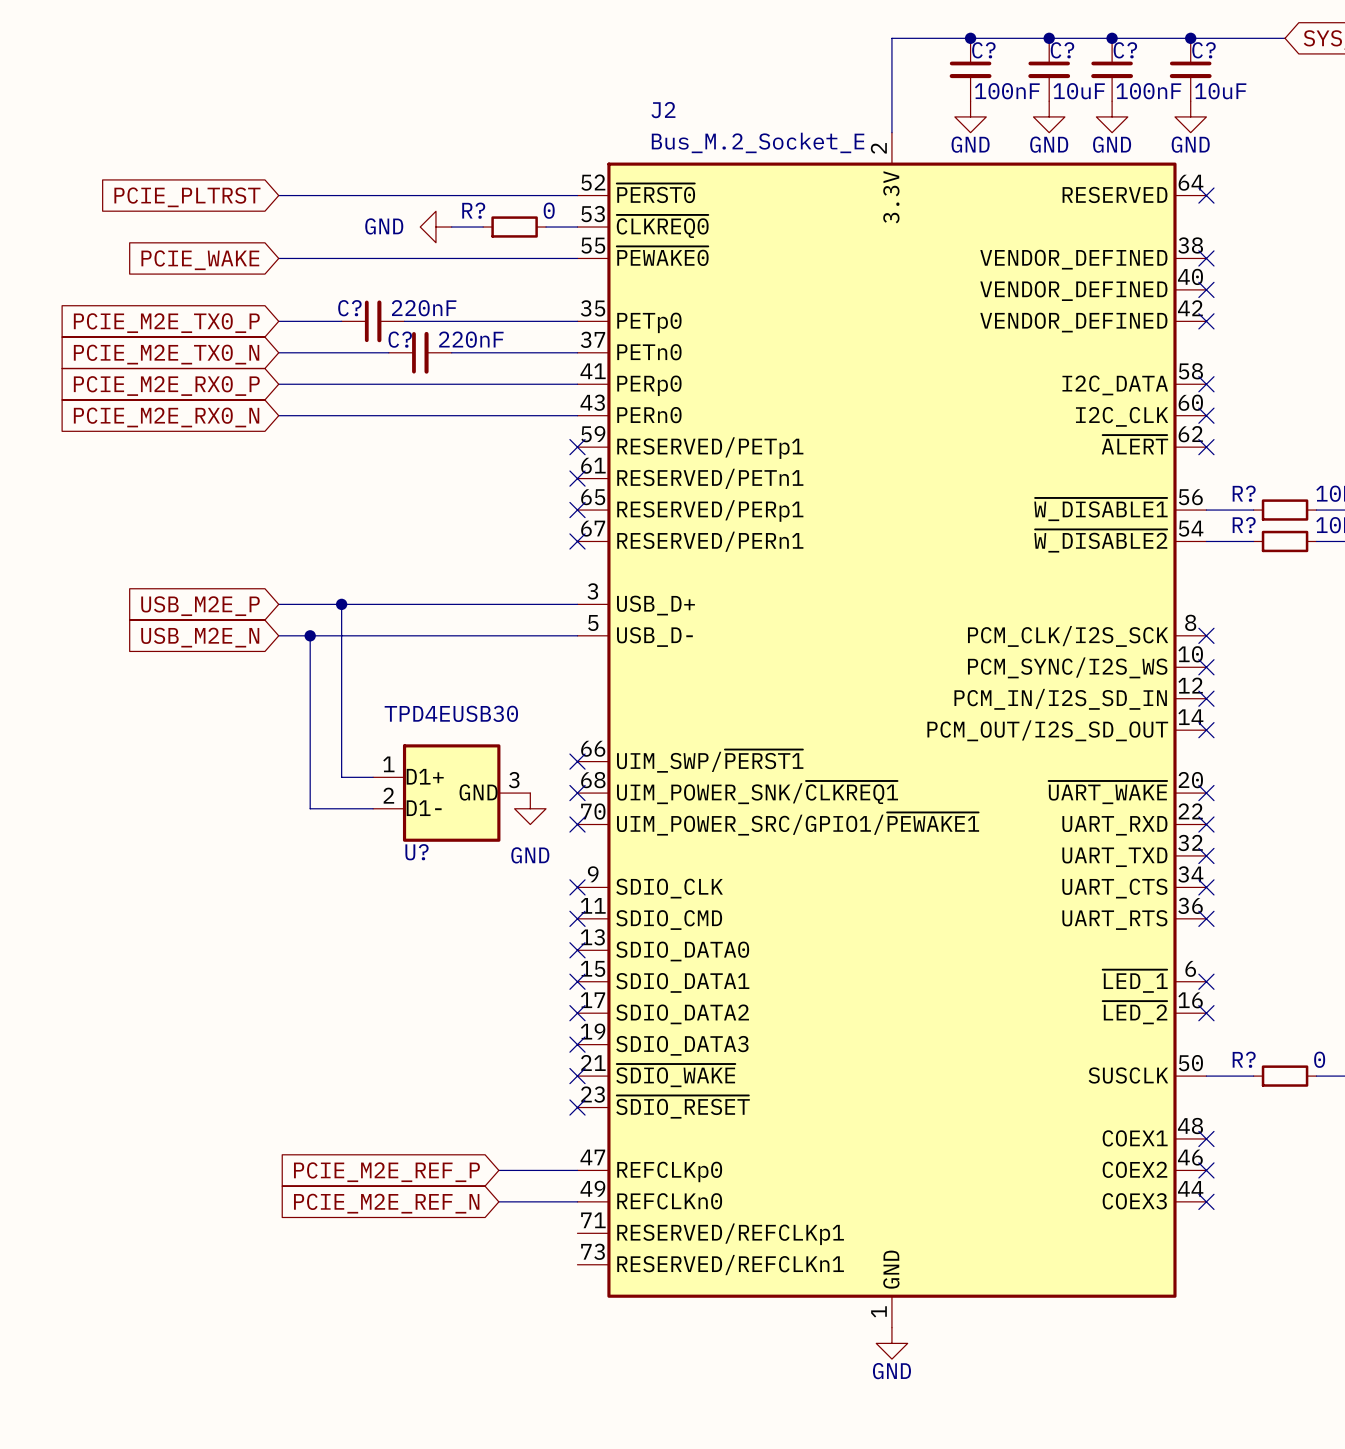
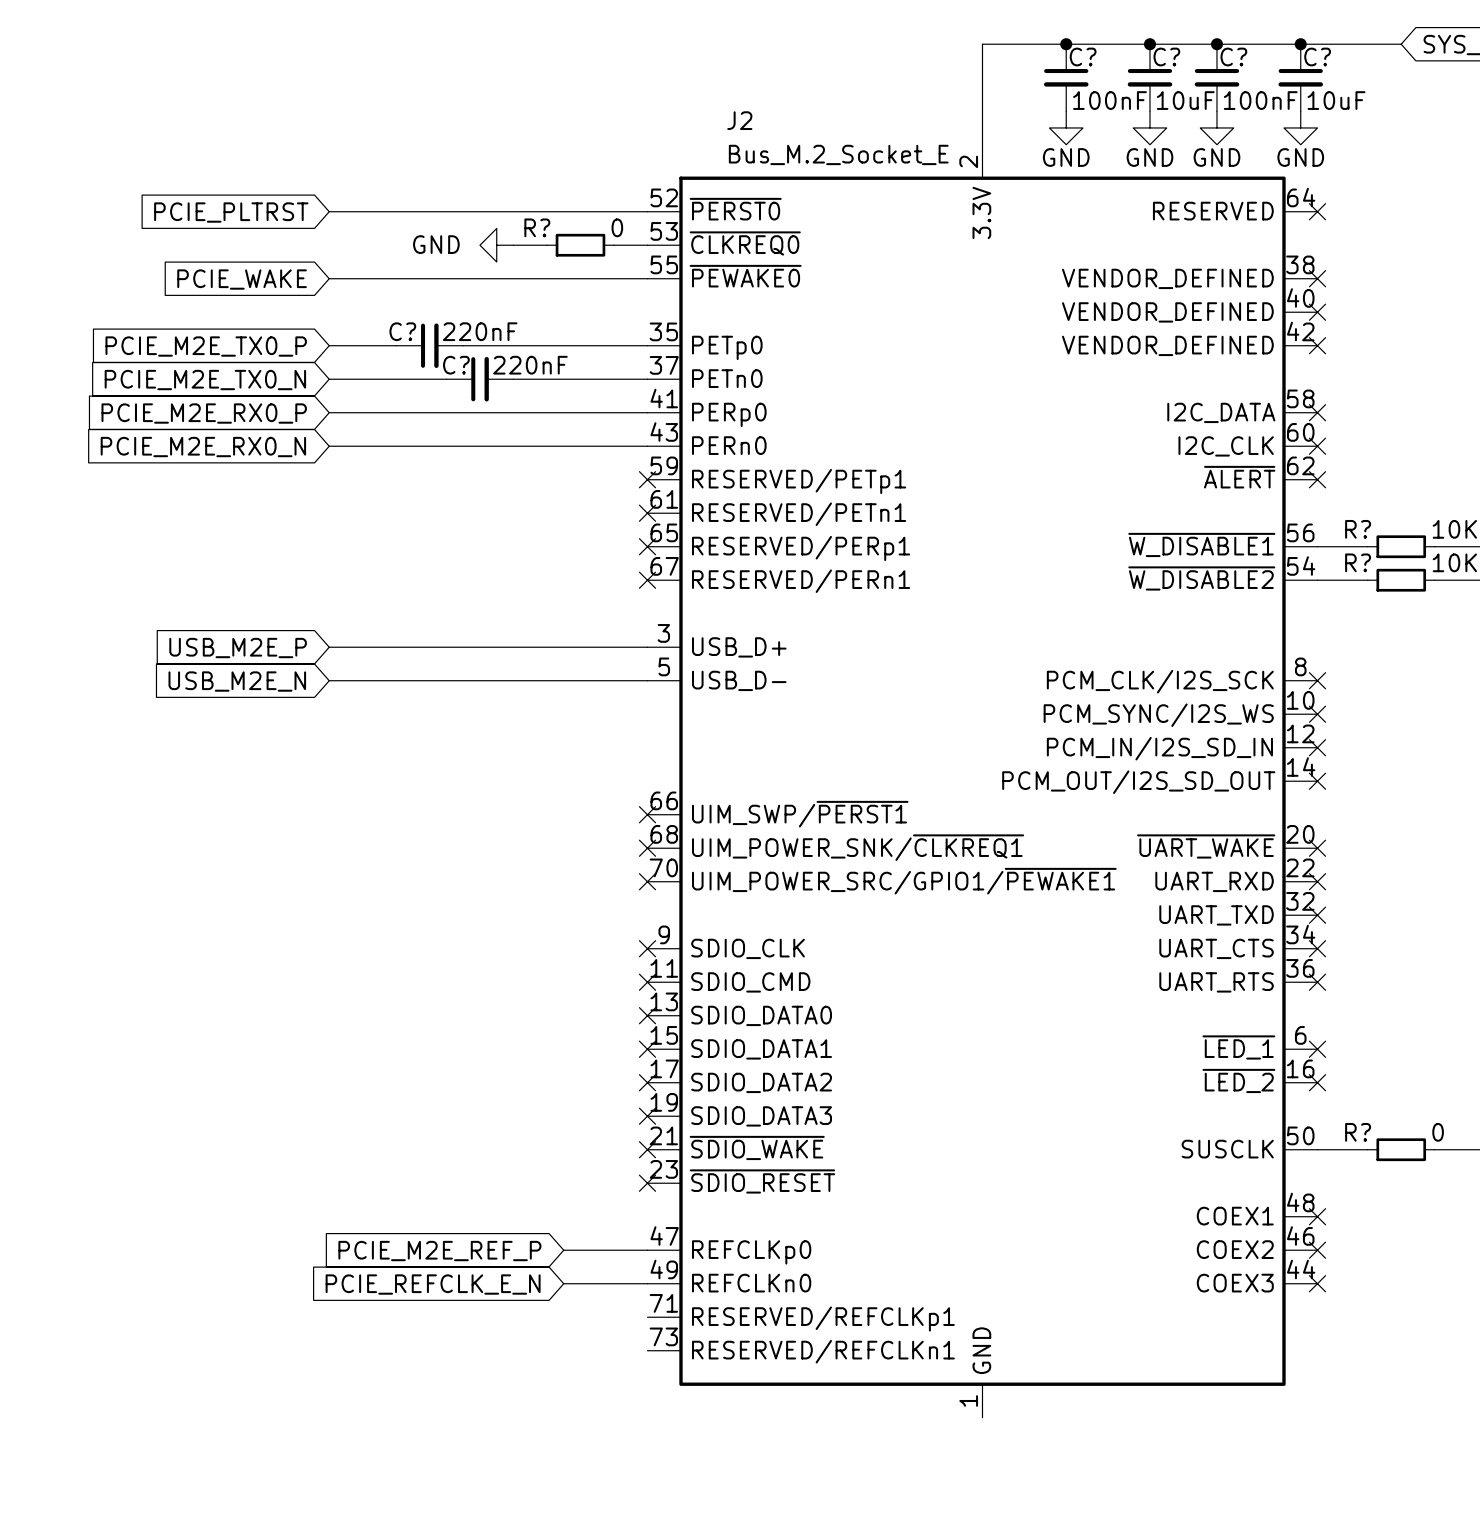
wire: (341, 604) (341, 777) (373, 777) -> none
junction: (341, 604) -> none
wire: (310, 635) (310, 808) (373, 808) -> none
junction: (310, 635) -> none
U?: TPD4EUSB30 (451, 793) -> none
power symbol: GND (530, 808) -> none
global label: PCIE_M2E_REF_N (386, 1203) -> PCIE_REFCLK_E_N (433, 1284)
power symbol: GND (891, 1343) -> none

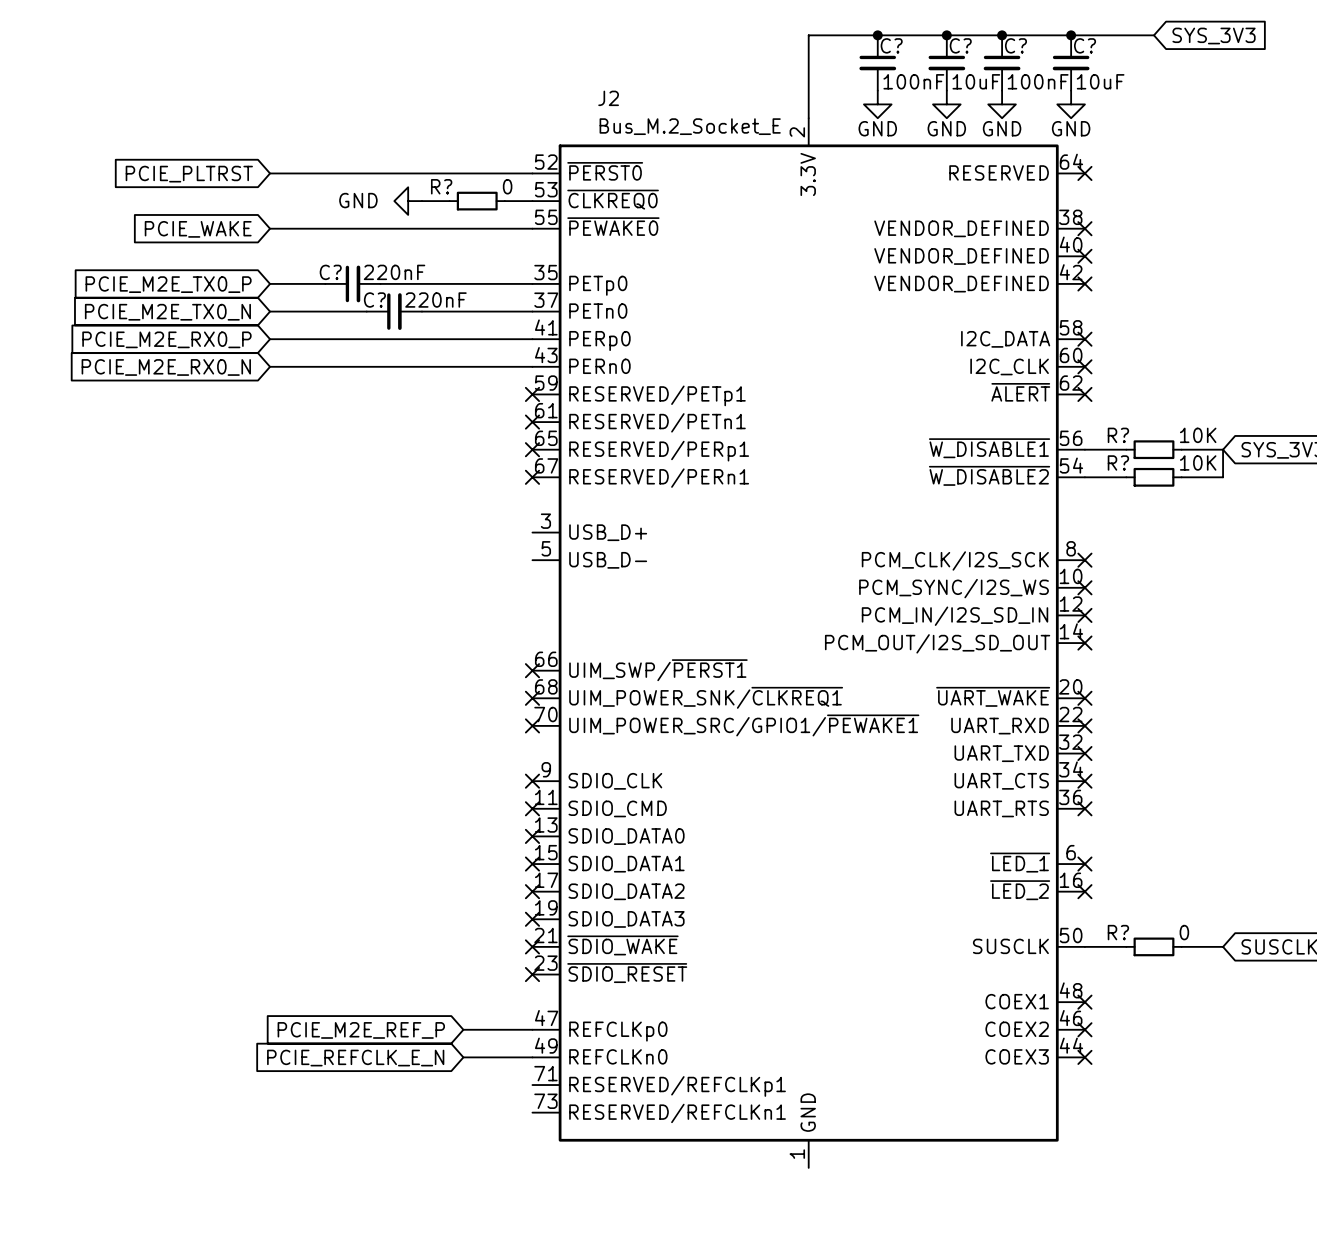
wire: (329, 647) (647, 647) -> none
global label: USB_M2E_P (238, 648) -> none
wire: (329, 680) (647, 680) -> none
global label: USB_M2E_N (237, 681) -> none

